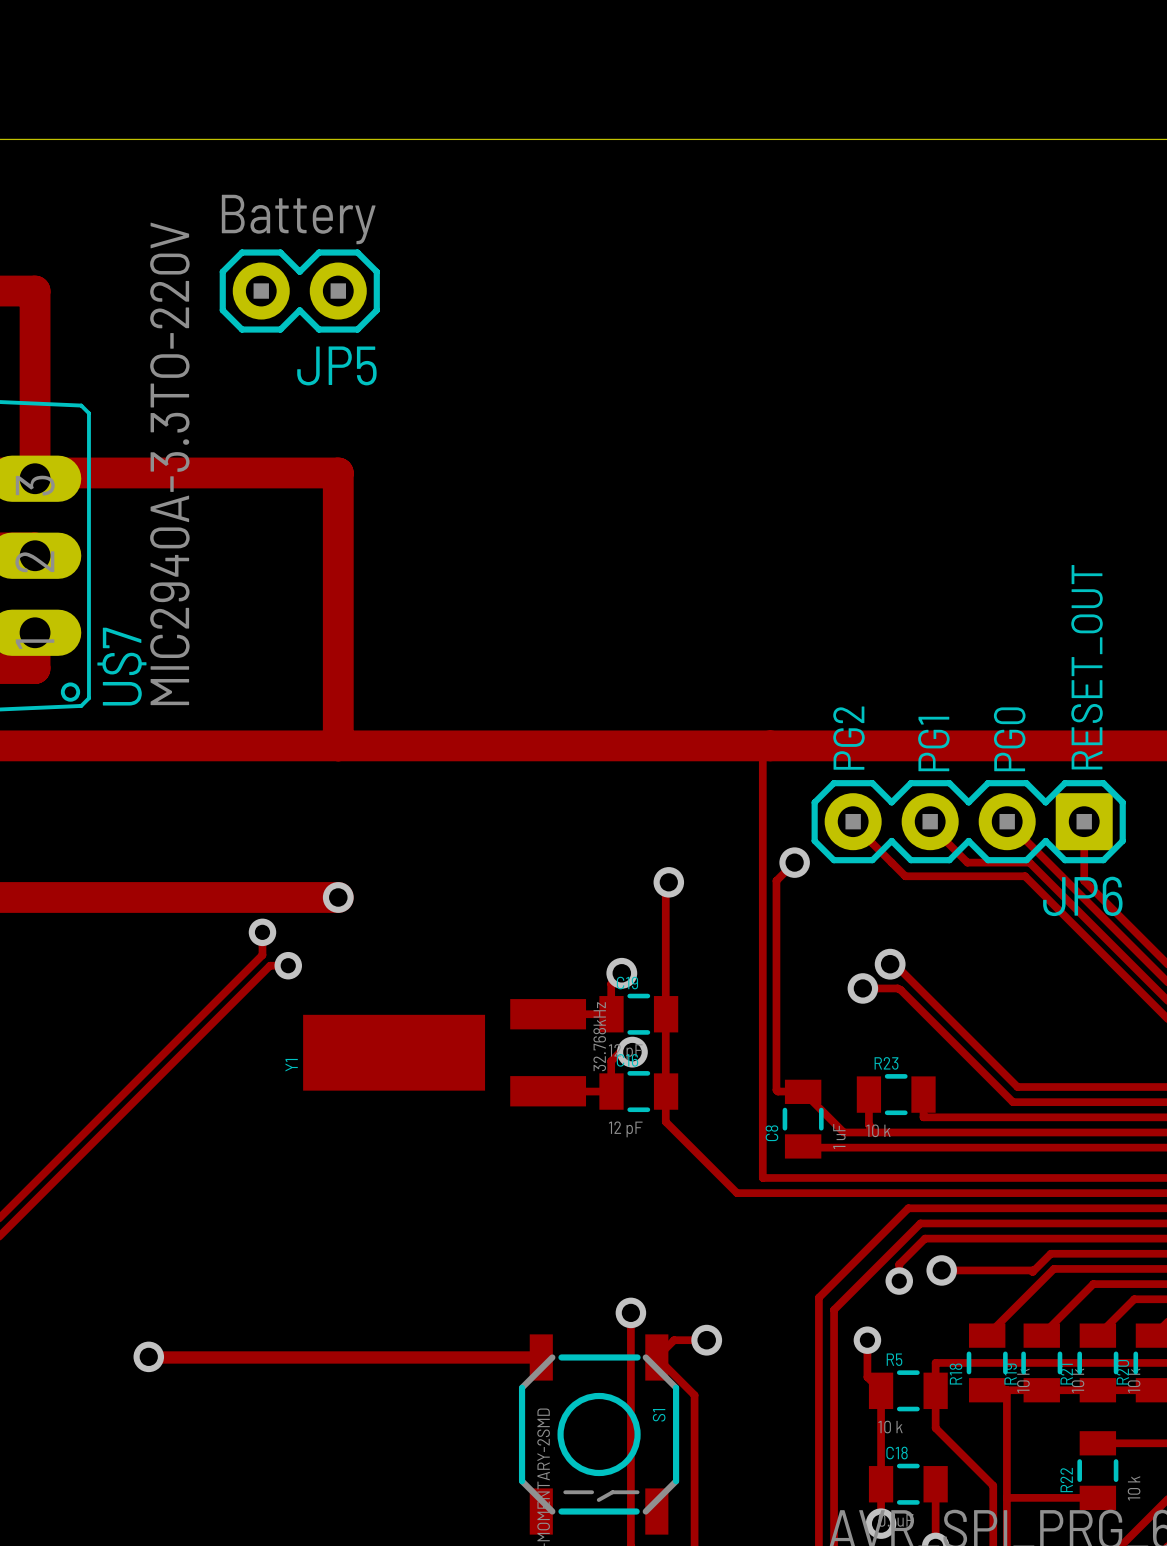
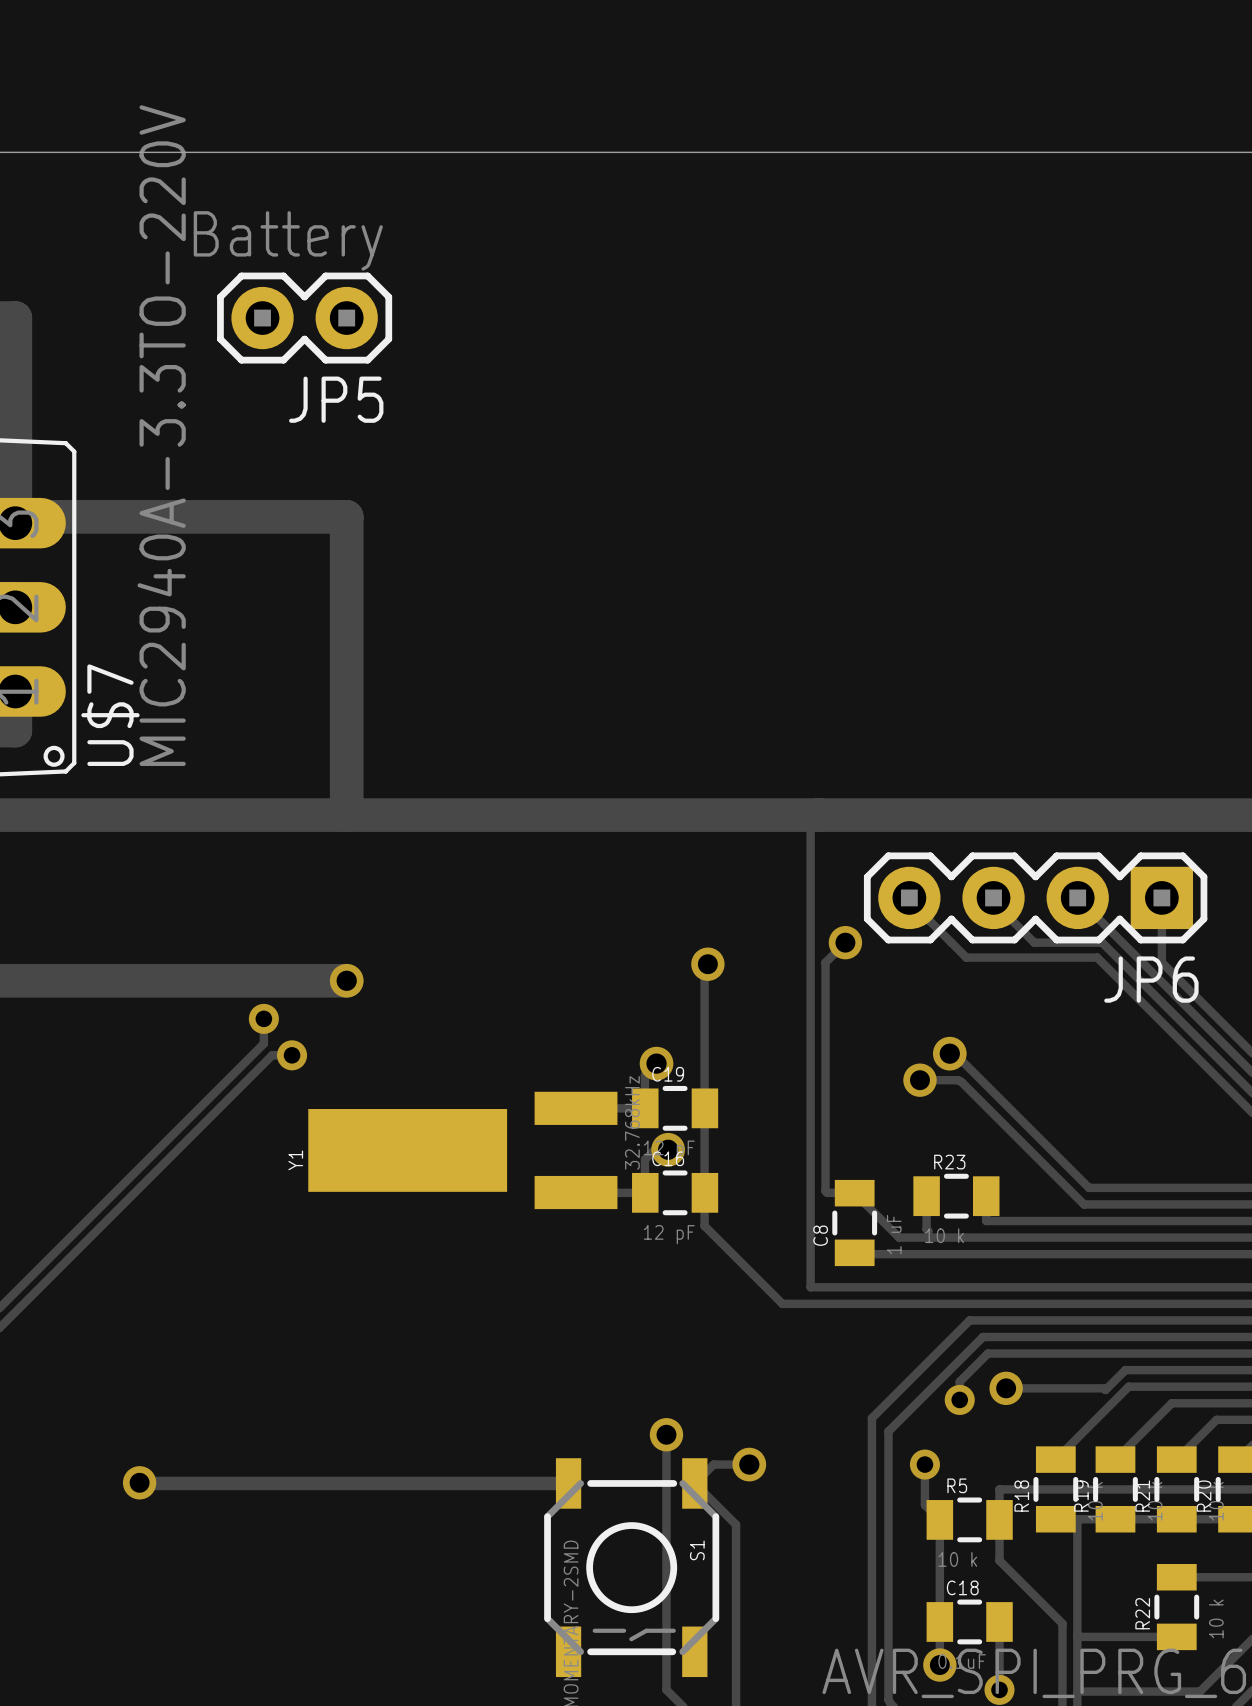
text: RESET_OUT (1087, 667) -> none
text: PG2 (848, 738) -> none
text: PG0 (1009, 739) -> none
text: PG1 (933, 744) -> none

